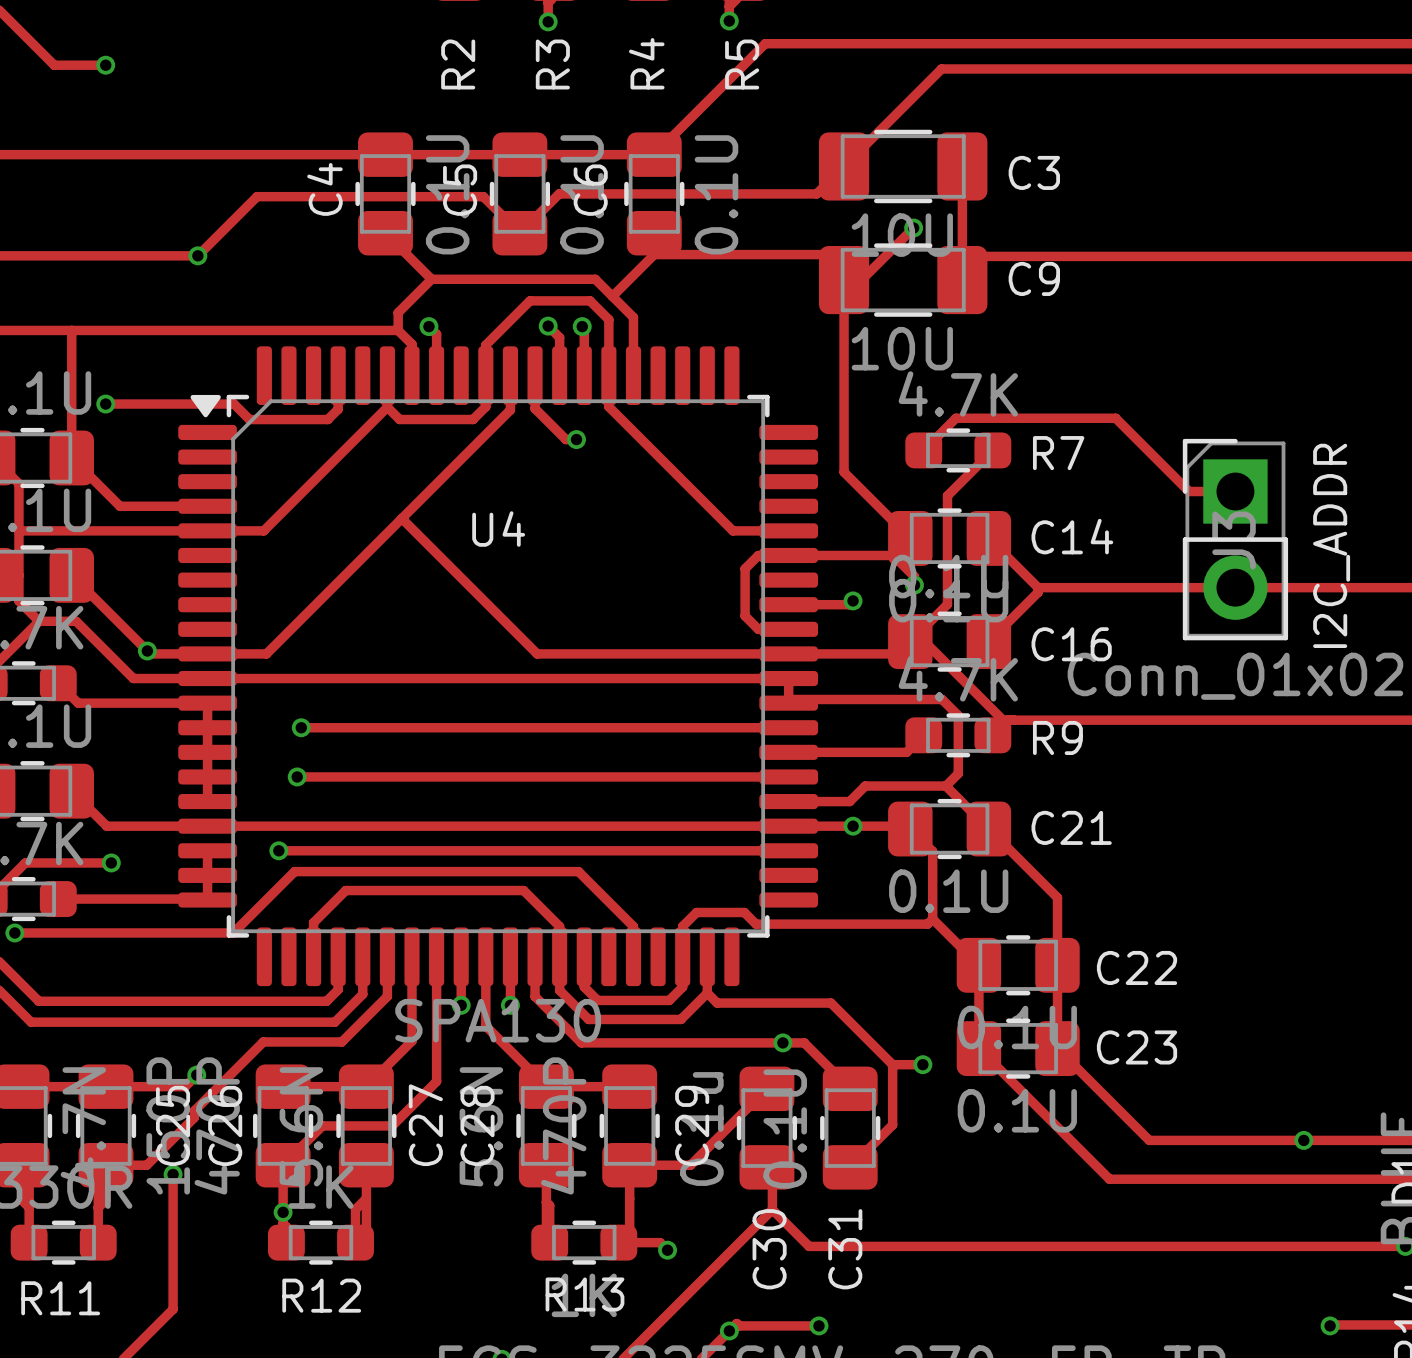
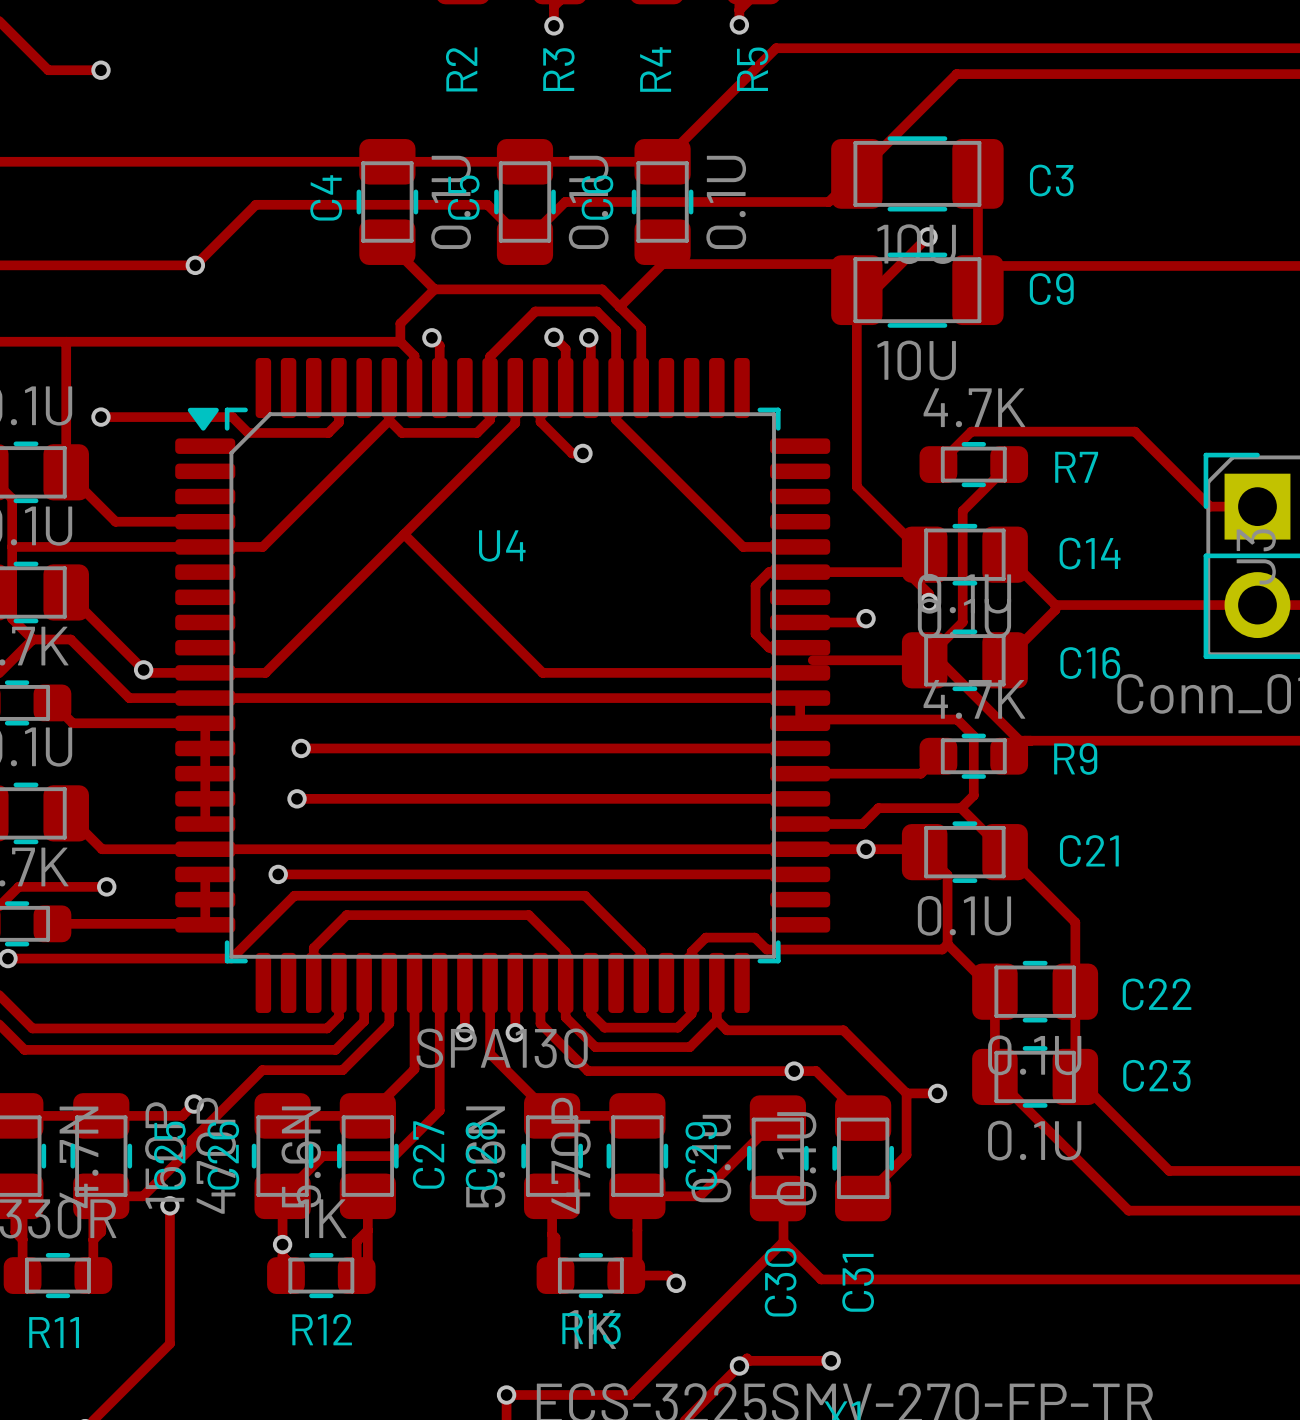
track: (910, 641) (898, 653) (788, 653) -> (924, 660) (812, 660)

